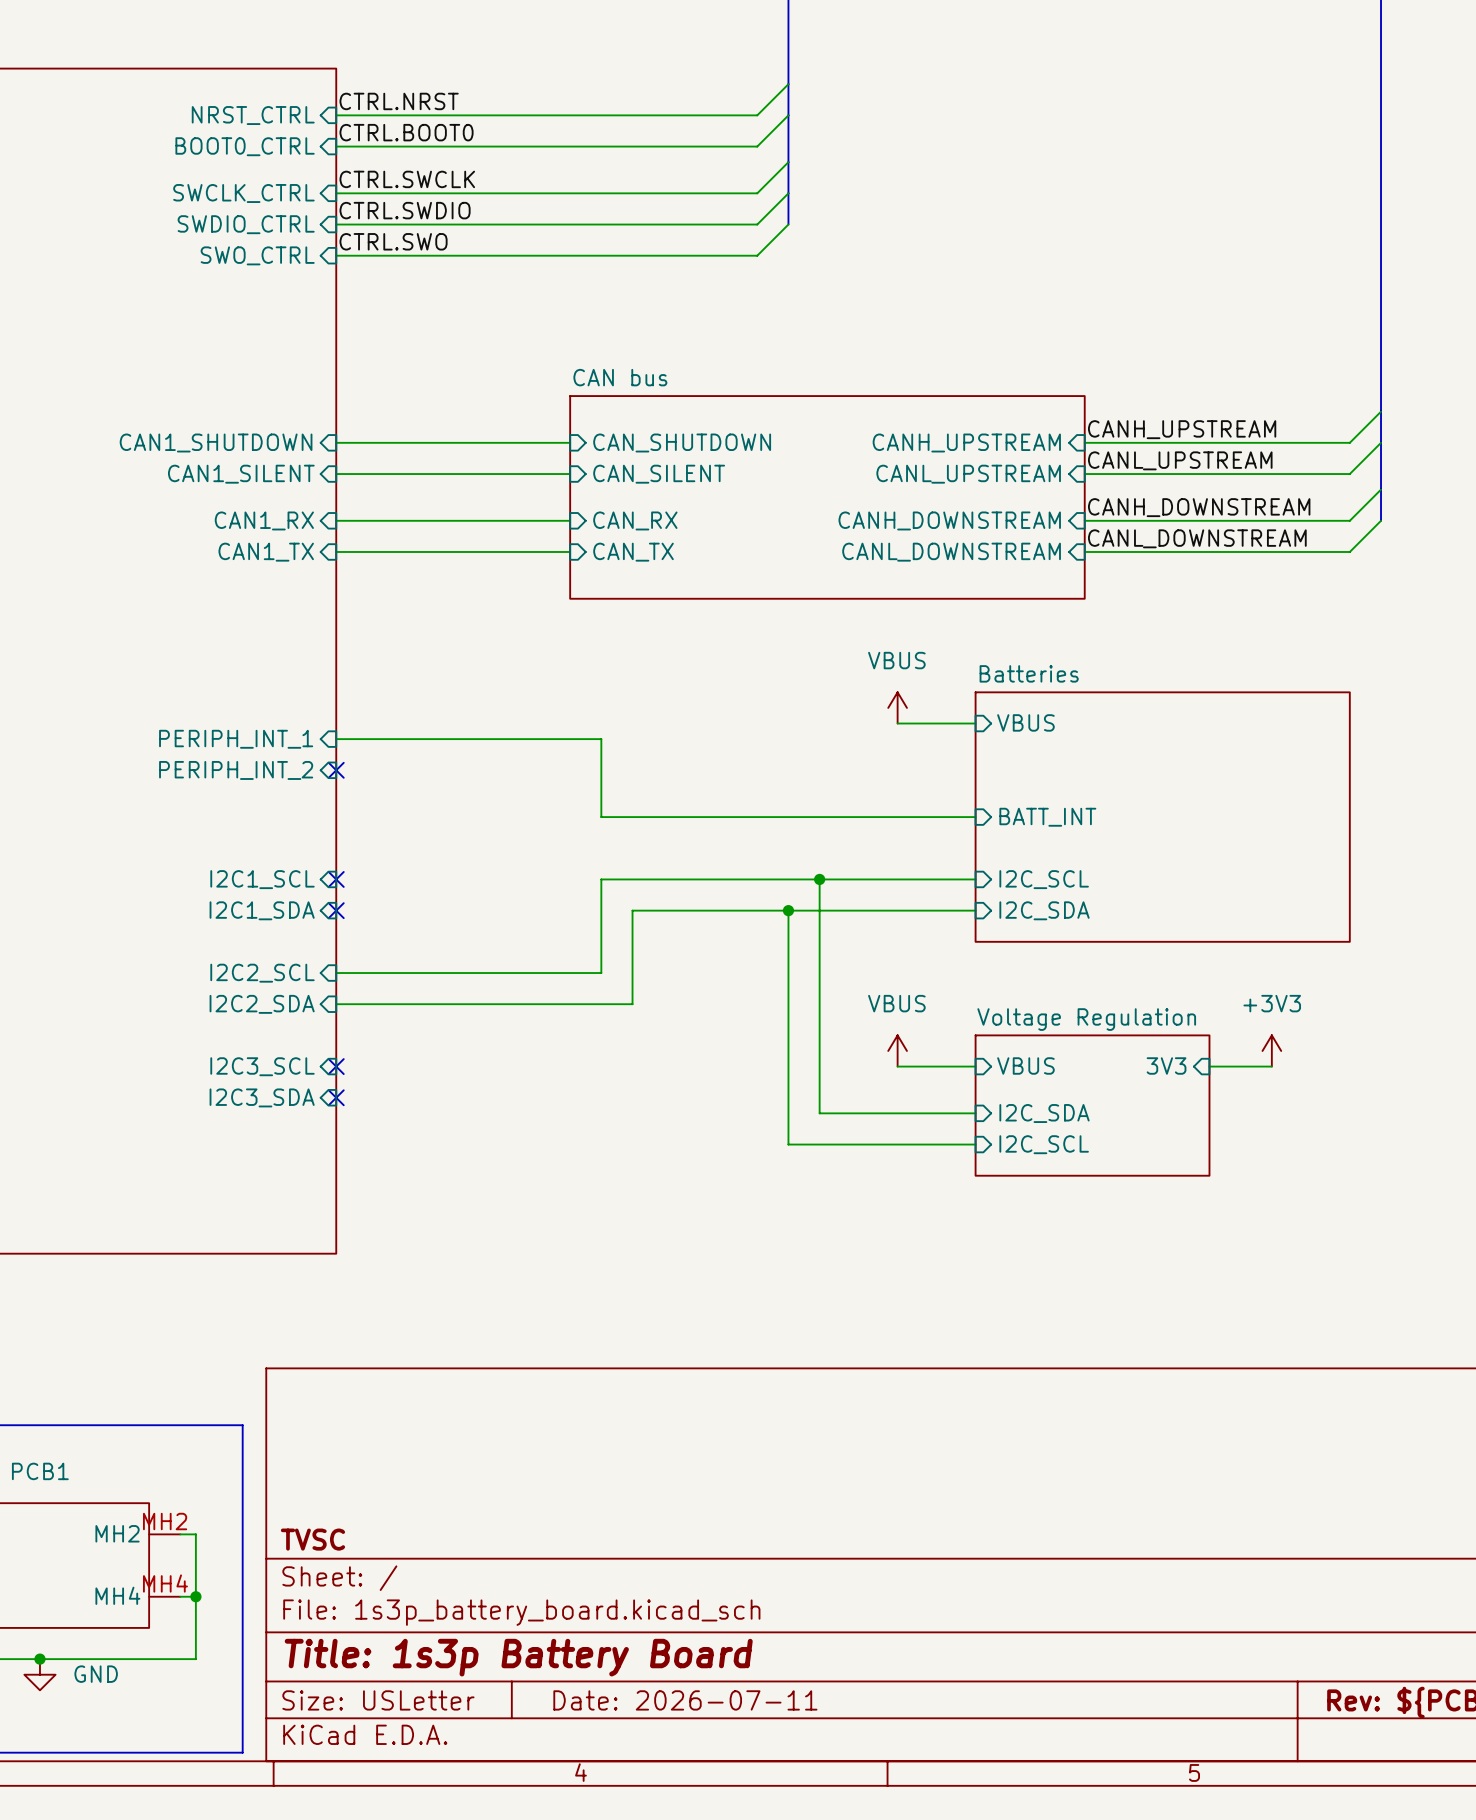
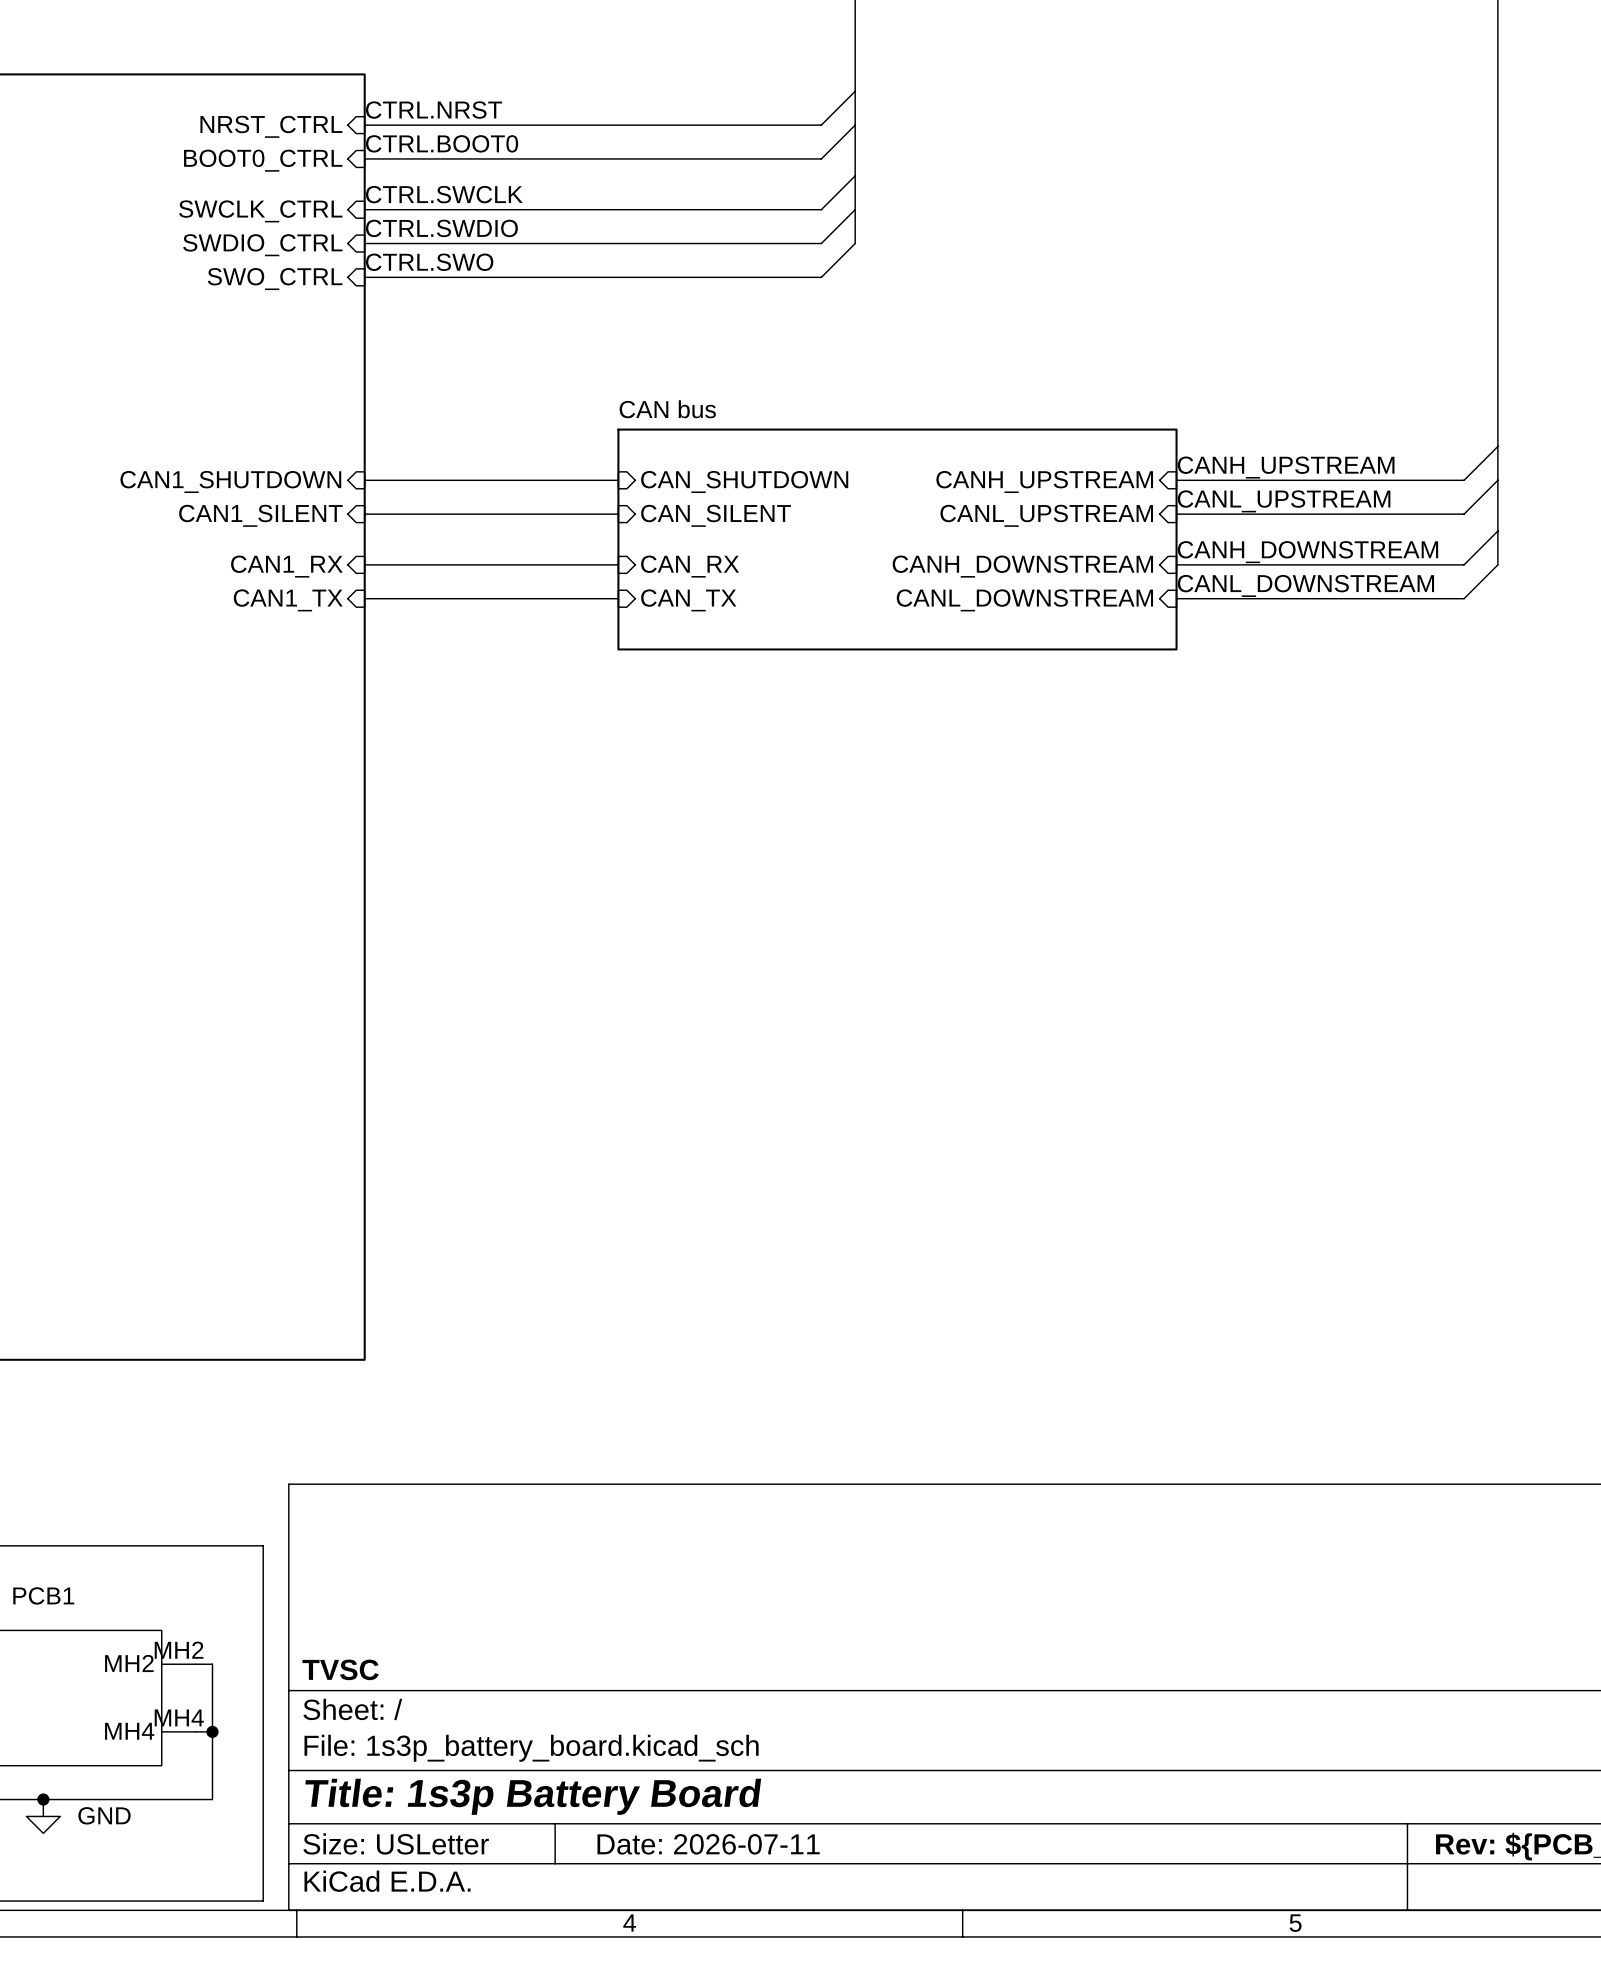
power symbol: VBUS (897, 707) -> none
sheet pin: VBUS (1025, 722) -> none
wire: (897, 723) (975, 723) -> none
sheet pin: PERIPH_INT_1 (236, 739) -> none
wire: (336, 739) (601, 739) (601, 817) (975, 817) -> none
sheet pin: PERIPH_INT_2 (236, 770) -> none
no-connect mark: (336, 770) -> none
sheet pin: BATT_INT (1047, 817) -> none
sheet Batteries: (1162, 817) -> none
sheet pin: I2C1_SCL (262, 879) -> none
no-connect mark: (336, 879) -> none
wire: (819, 879) (819, 1113) (975, 1113) -> none
junction: (819, 879) -> none
wire: (975, 879) (601, 879) (601, 973) (336, 973) -> none
sheet pin: I2C_SCL (1044, 879) -> none
sheet pin: I2C1_SDA (262, 910) -> none
no-connect mark: (336, 910) -> none
wire: (788, 910) (788, 1144) (975, 1144) -> none
junction: (788, 910) -> none
wire: (975, 910) (632, 910) (632, 1004) (336, 1004) -> none
sheet pin: I2C_SDA (1044, 910) -> none
sheet pin: I2C2_SCL (262, 973) -> none
sheet pin: I2C2_SDA (262, 1004) -> none
power symbol: VBUS (897, 1050) -> none
power symbol: +3V3 (1271, 1050) -> none
sheet pin: VBUS (1025, 1065) -> none
sheet pin: 3V3 (1166, 1065) -> none
sheet pin: I2C3_SCL (262, 1066) -> none
no-connect mark: (336, 1066) -> none
wire: (897, 1066) (975, 1066) -> none
wire: (1209, 1066) (1271, 1066) -> none
sheet pin: I2C3_SDA (262, 1097) -> none
no-connect mark: (336, 1097) -> none
sheet Voltage Regulation: (1092, 1105) -> none
sheet pin: I2C_SDA (1044, 1113) -> none
sheet pin: I2C_SCL (1044, 1144) -> none

